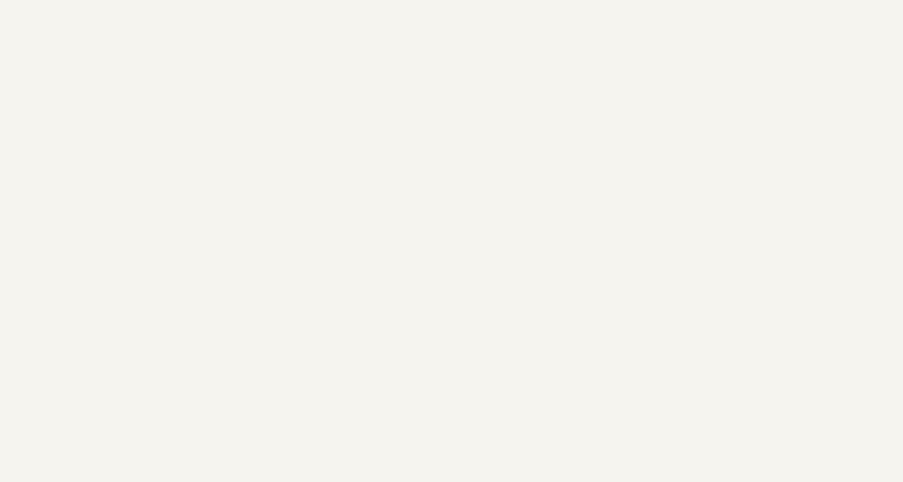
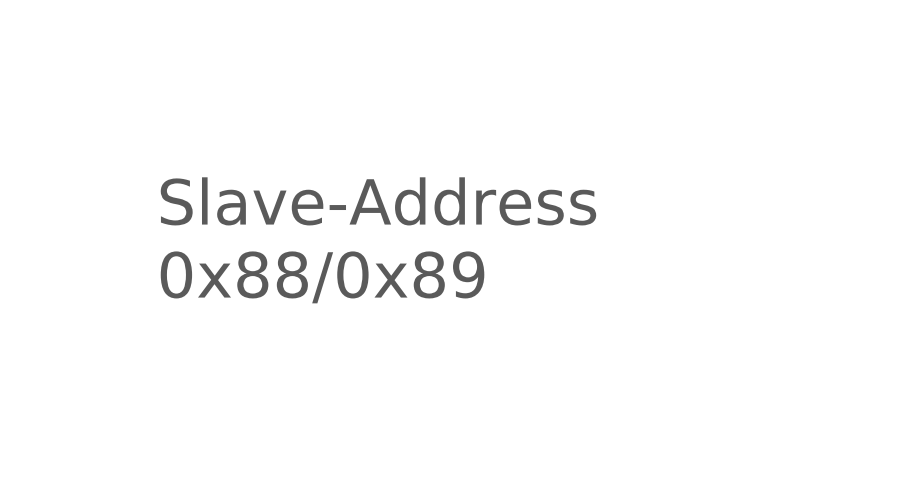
text: none -> Slave-Address (378, 201)
text: none -> 0x88/0x89 (322, 277)

